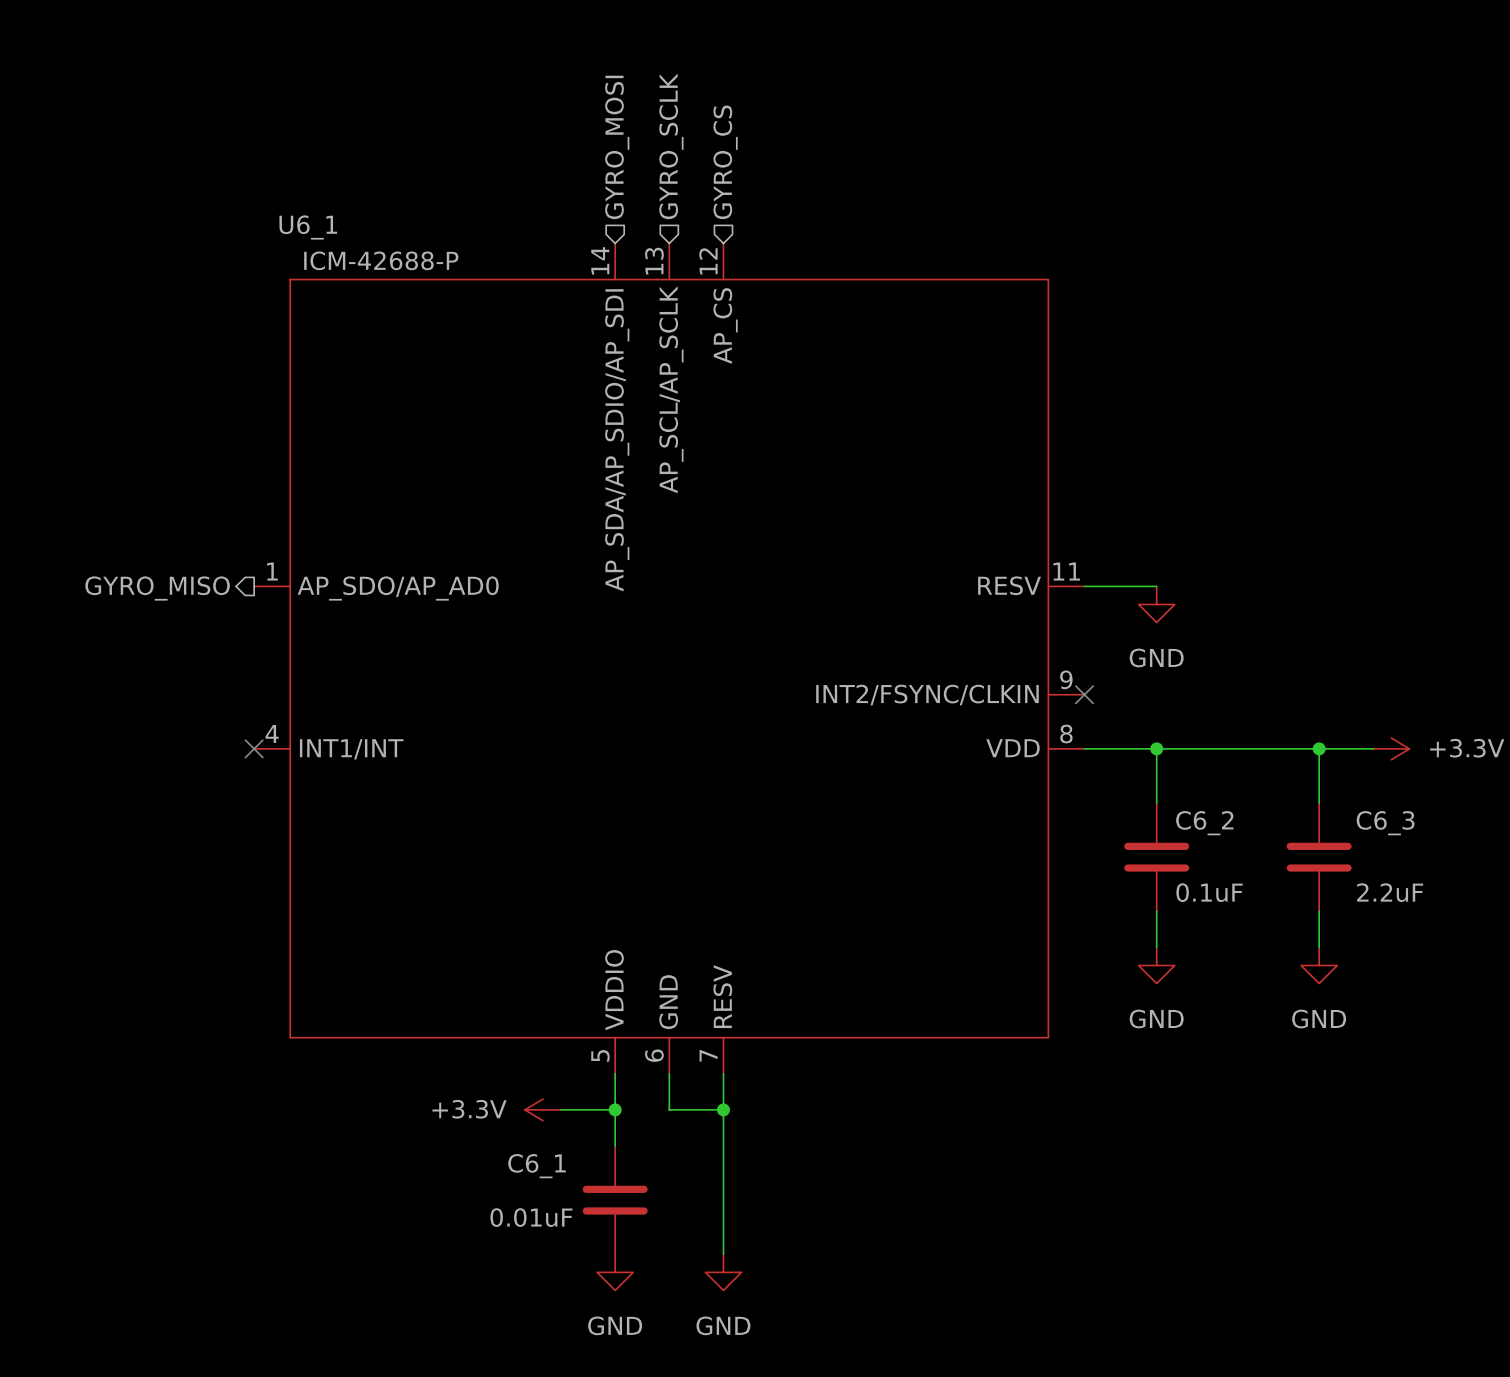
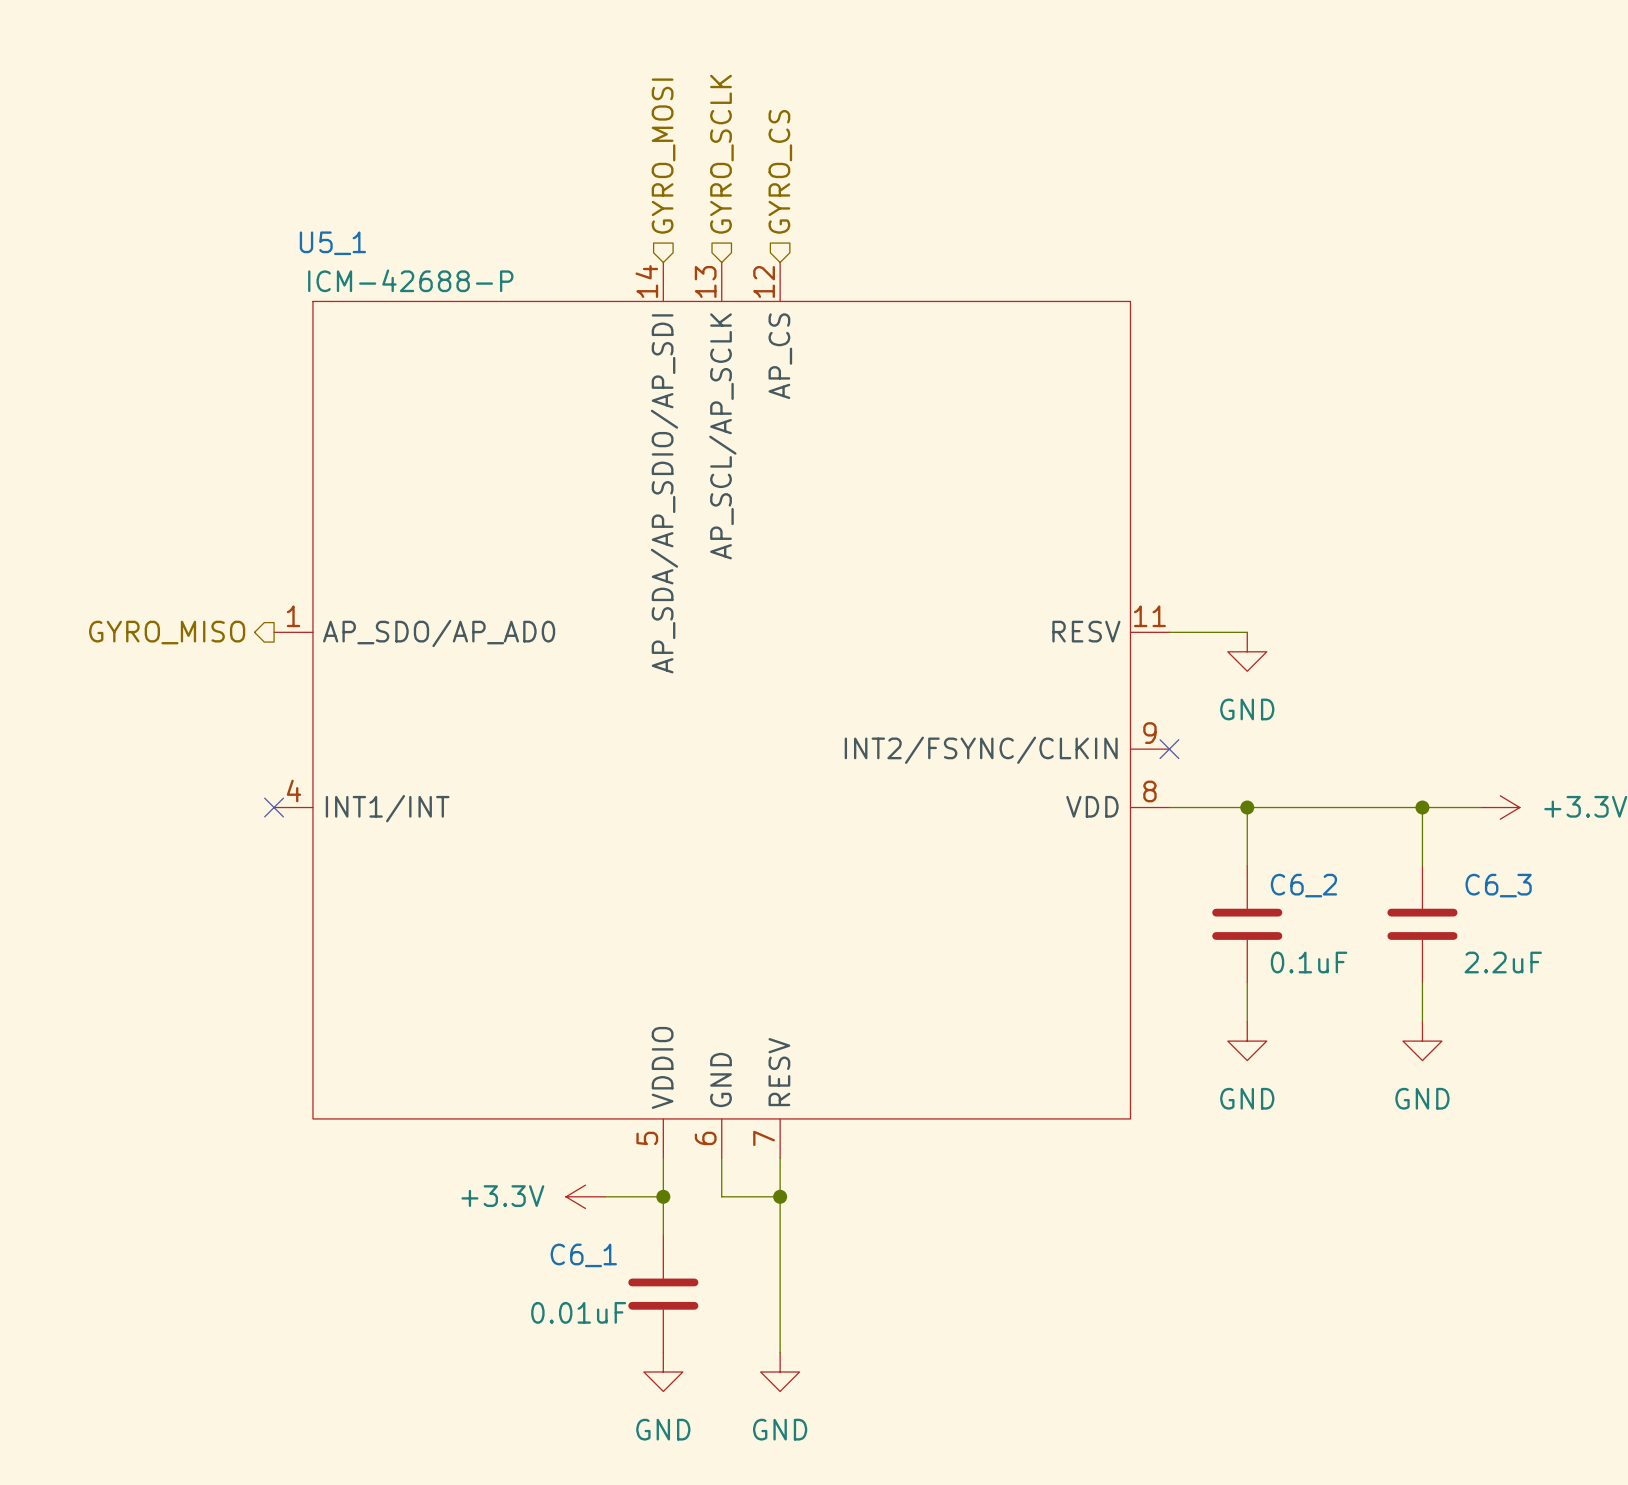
U6_1 name: U6_1 (308, 227) -> U5_1 (332, 243)

